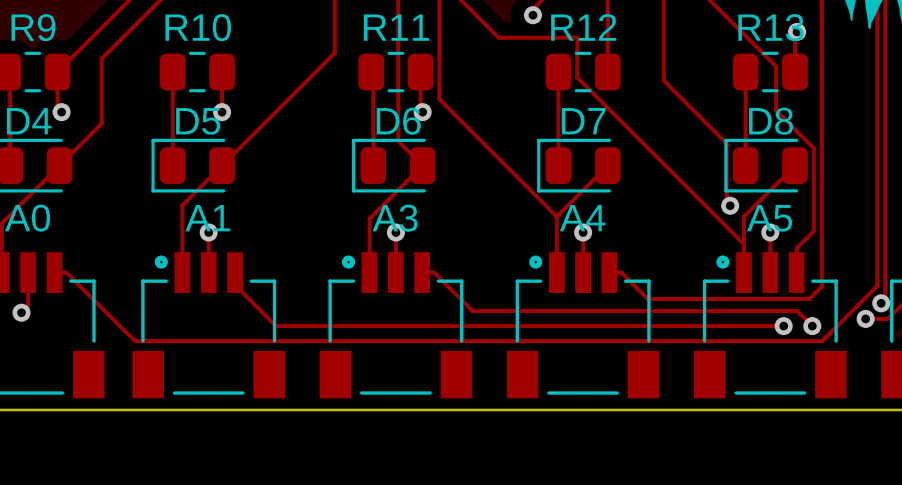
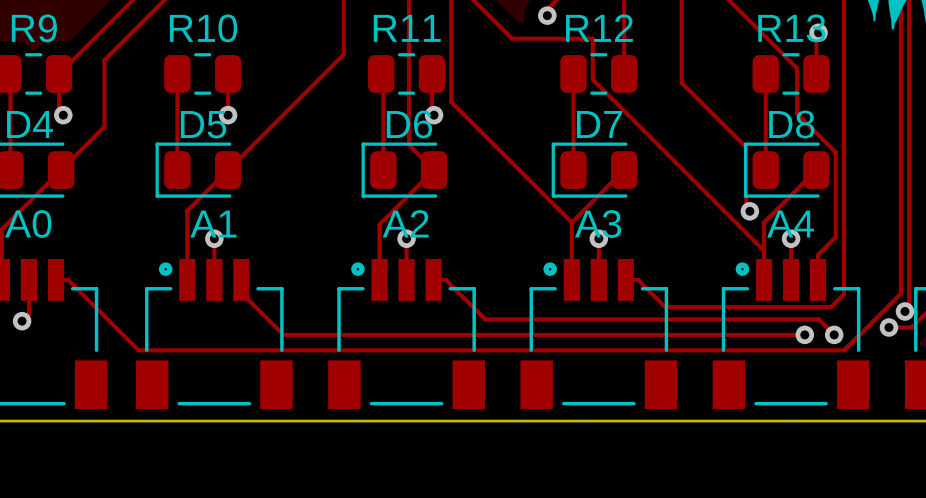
part value: A3 (395, 218) -> A2 (405, 223)
part value: A4 (582, 218) -> A3 (598, 224)
part value: A5 (769, 218) -> A4 (790, 224)

